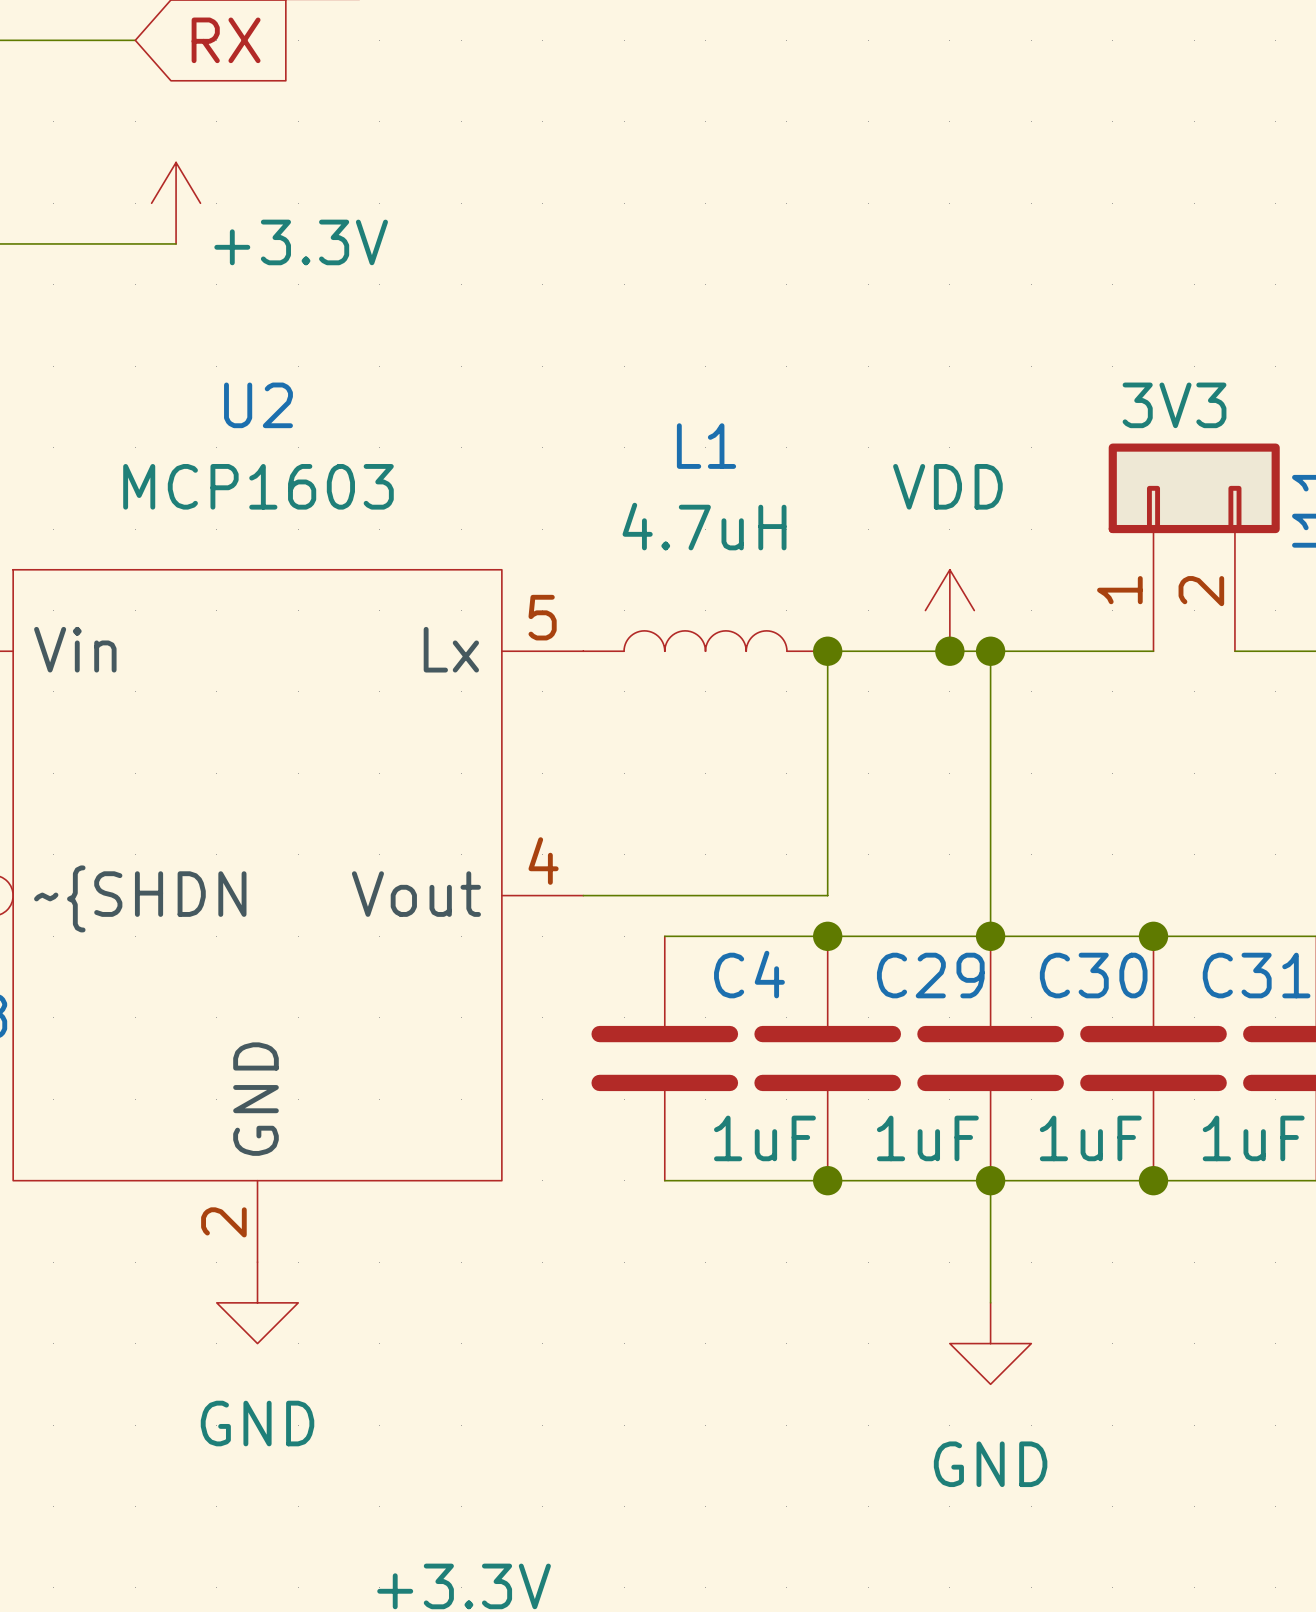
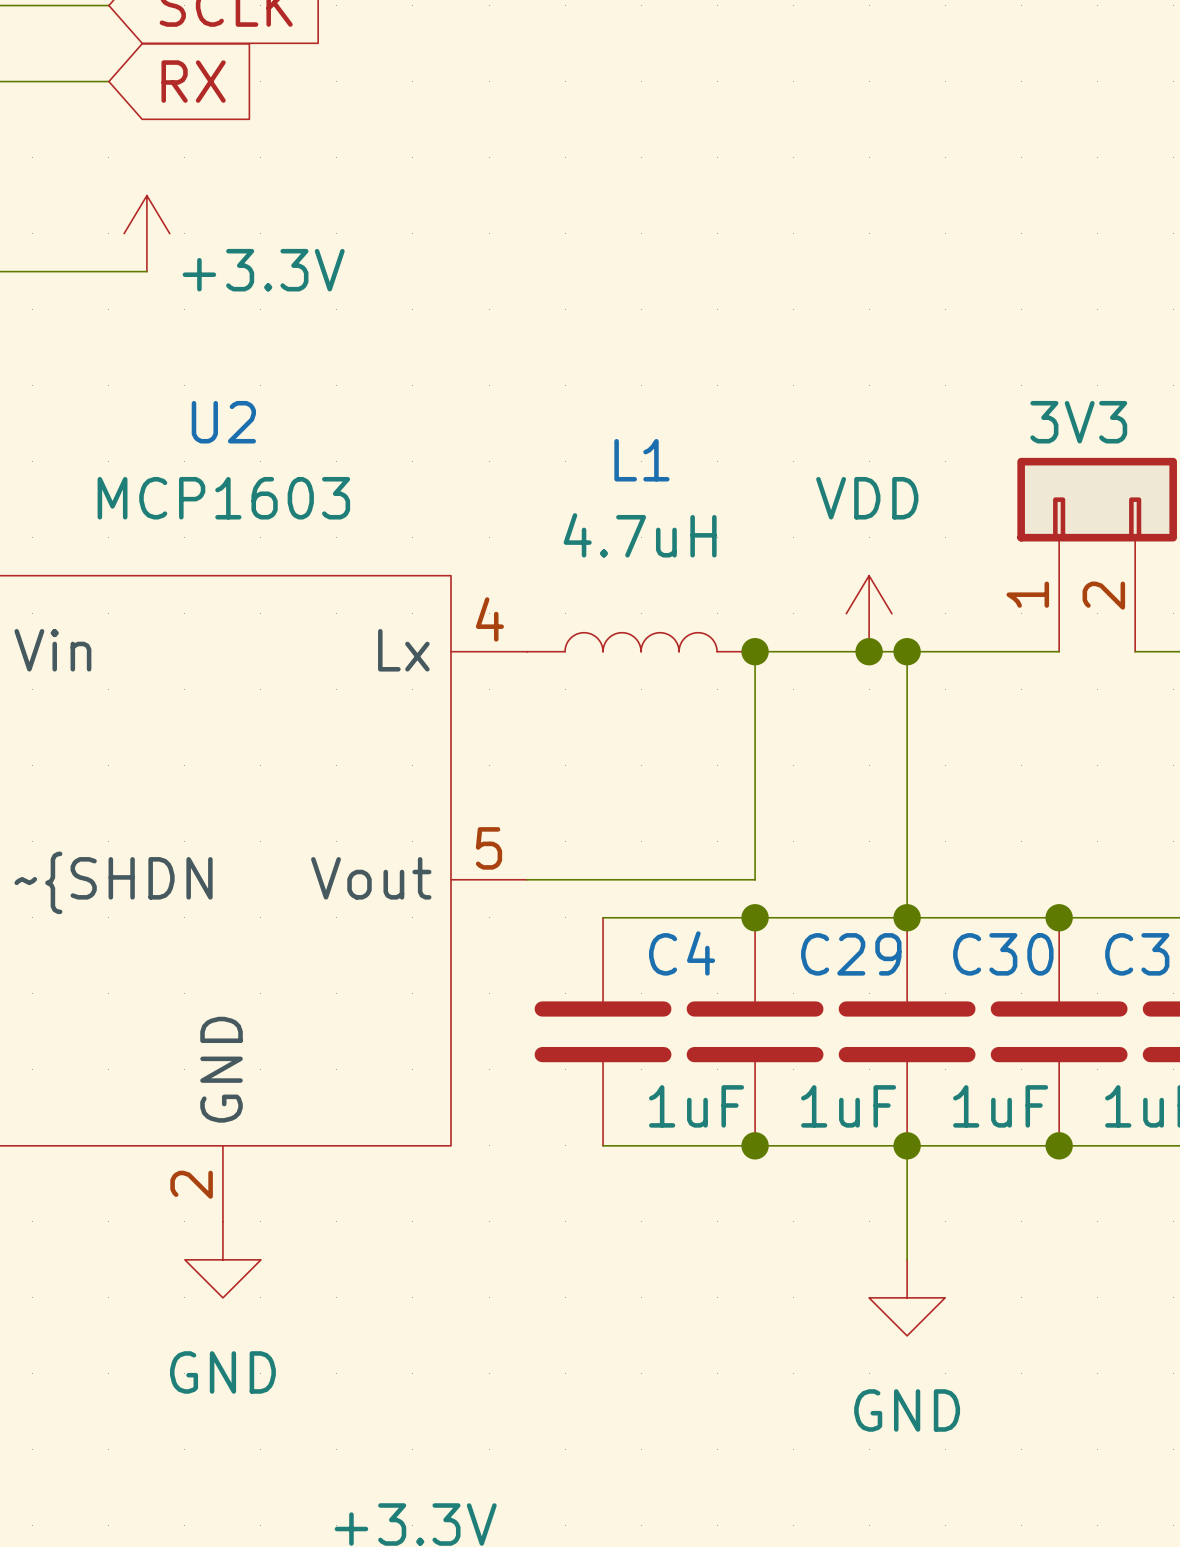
U2 pin number: 5 (542, 617) -> 4 (489, 619)
U2 pin number: 4 (543, 861) -> 5 (489, 848)

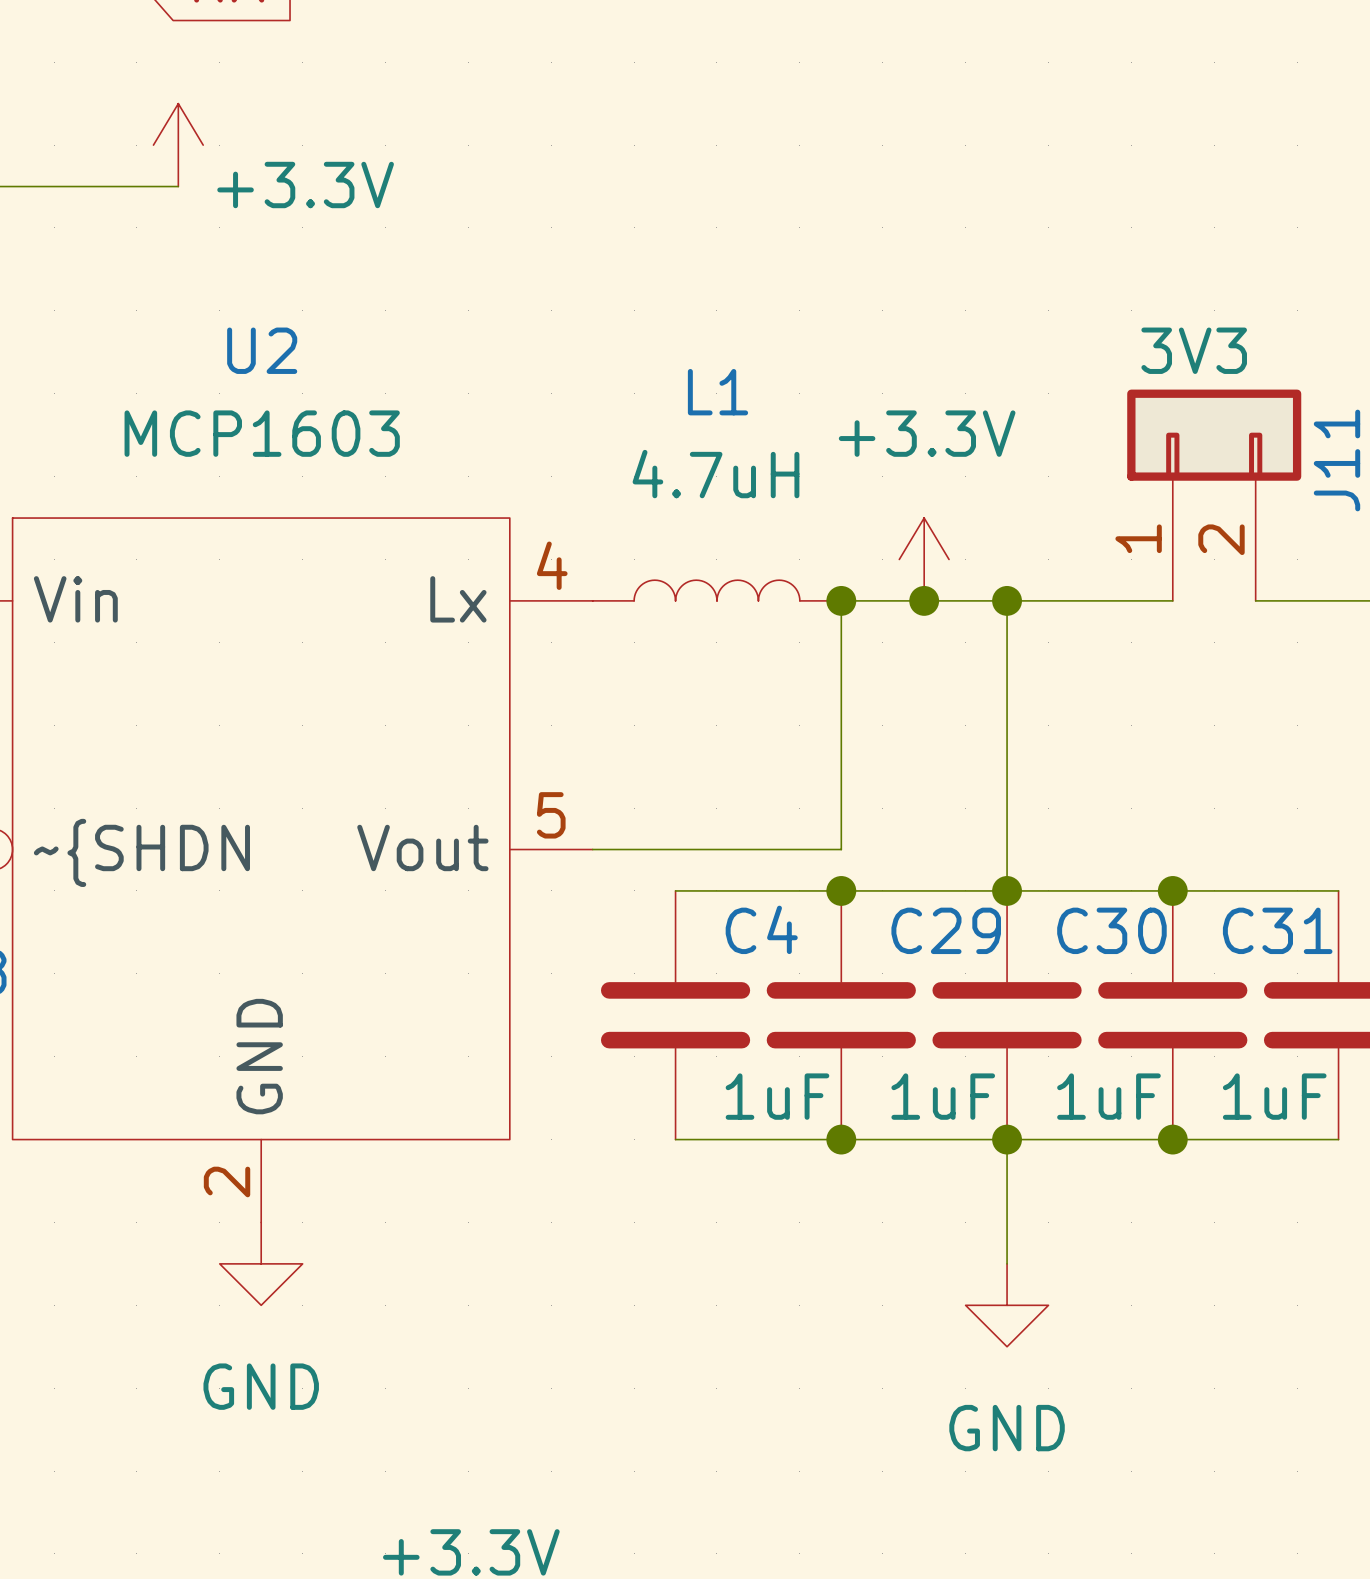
power symbol: none -> +3.3V (924, 559)
power symbol: VDD (869, 613) -> none
junction position: (869, 651) -> (924, 600)

